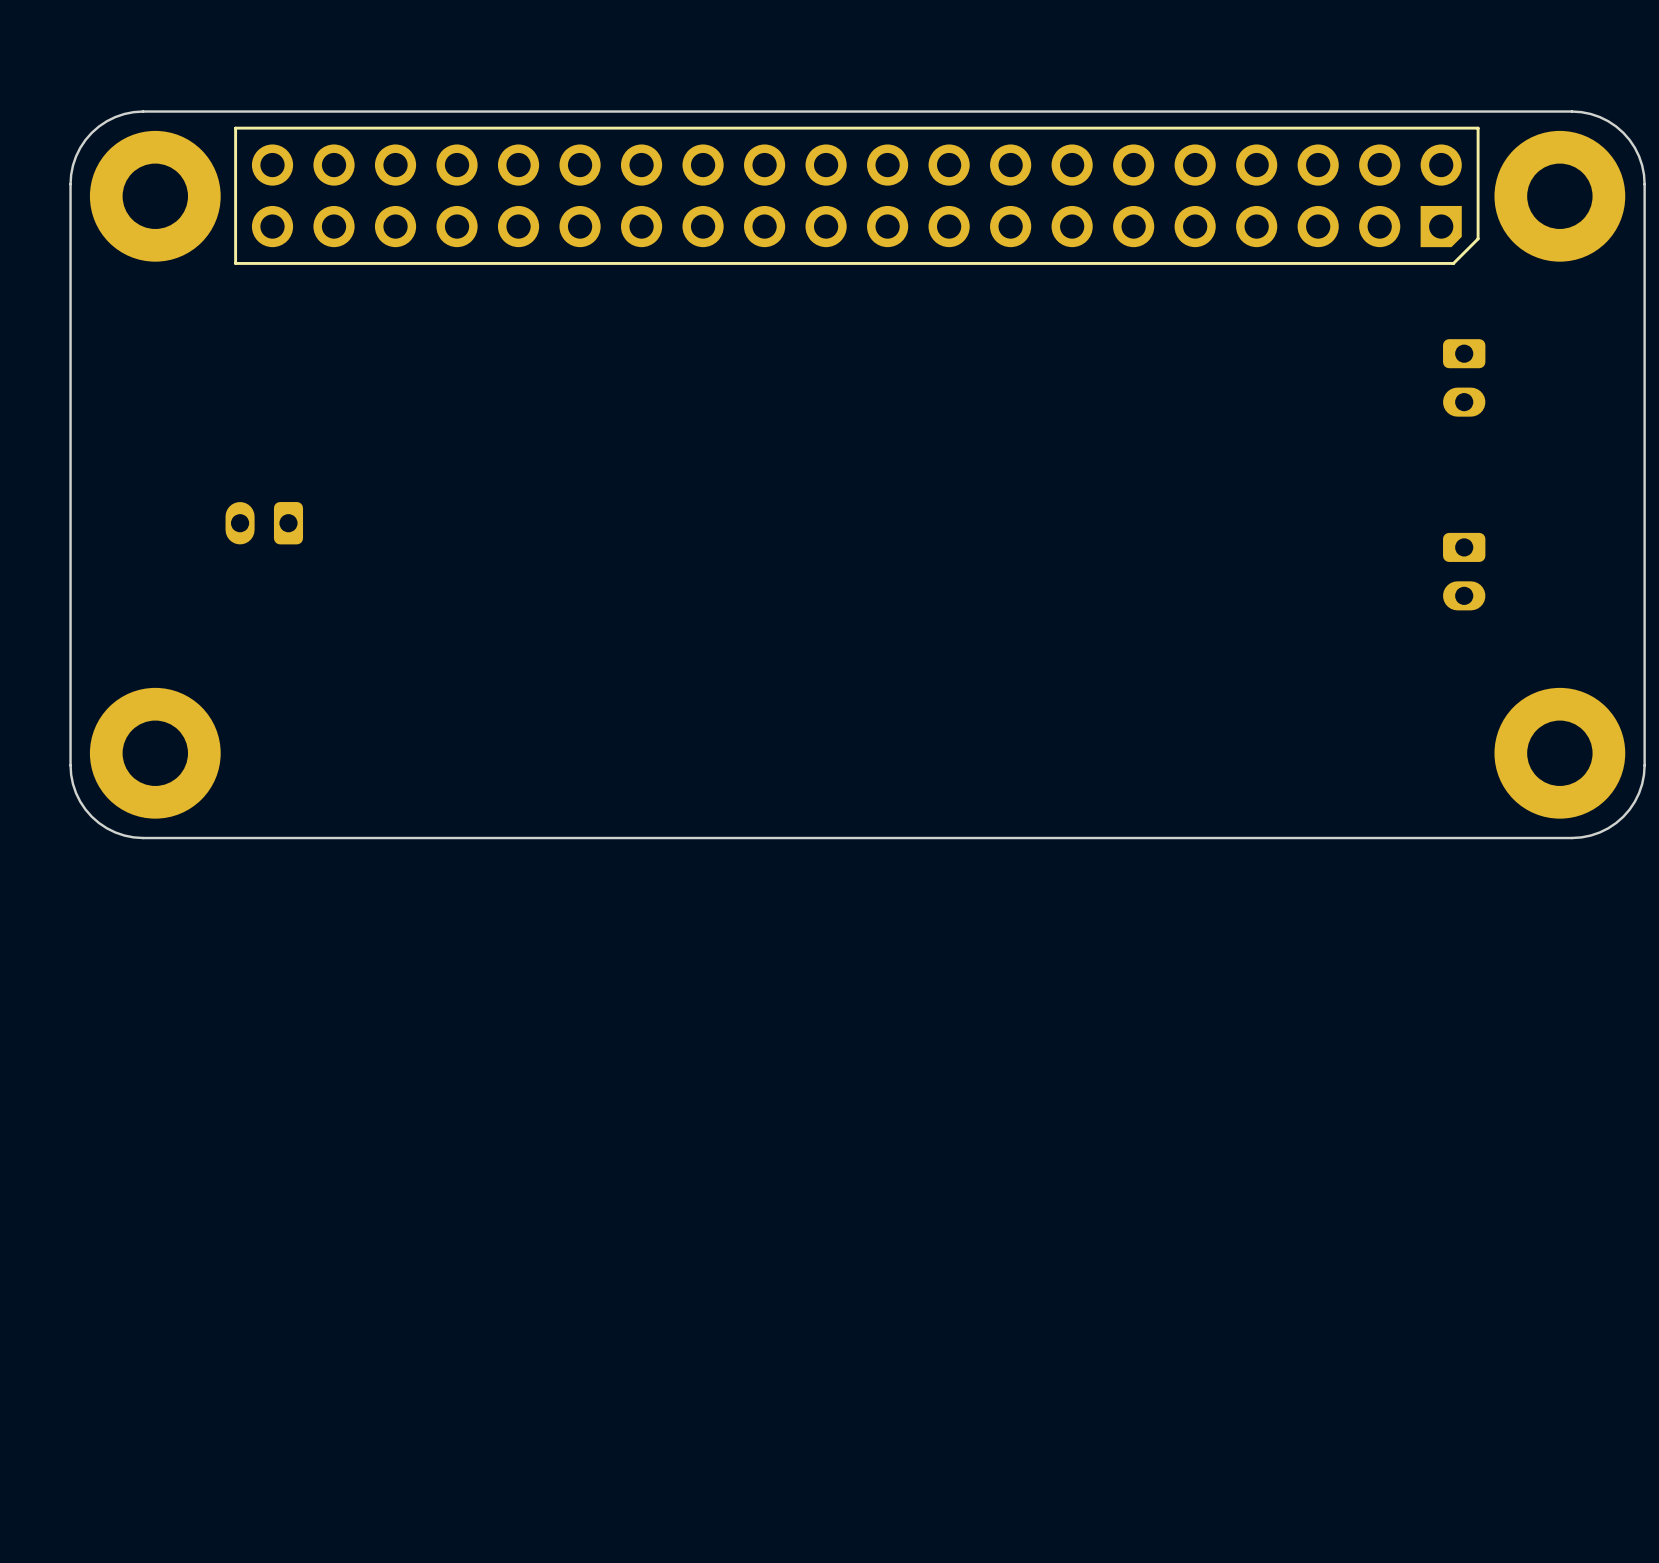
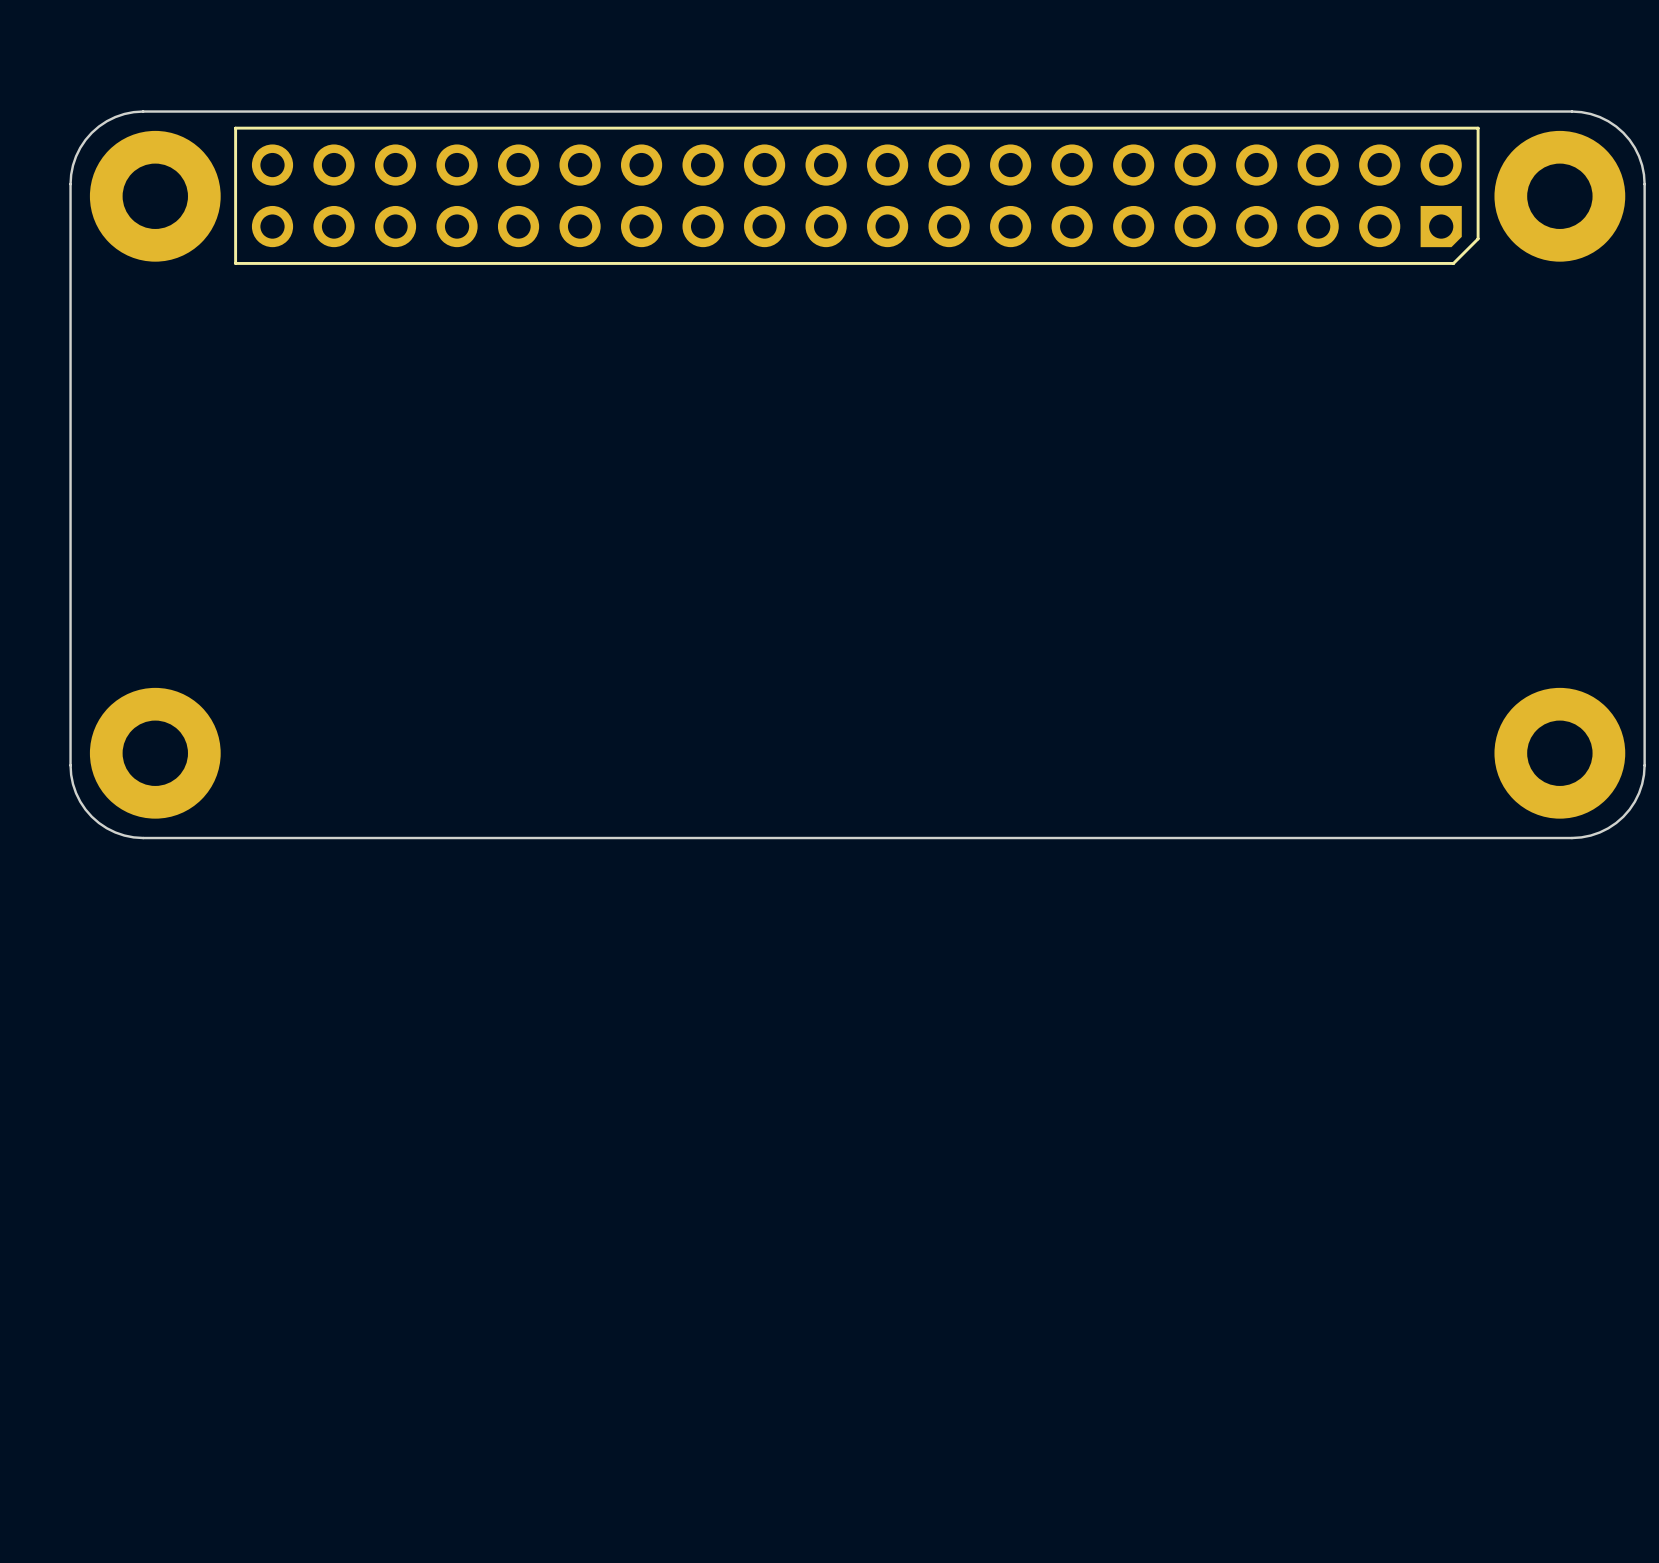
part: (1464, 377) -> none
part: (264, 523) -> none
part: (1464, 571) -> none

